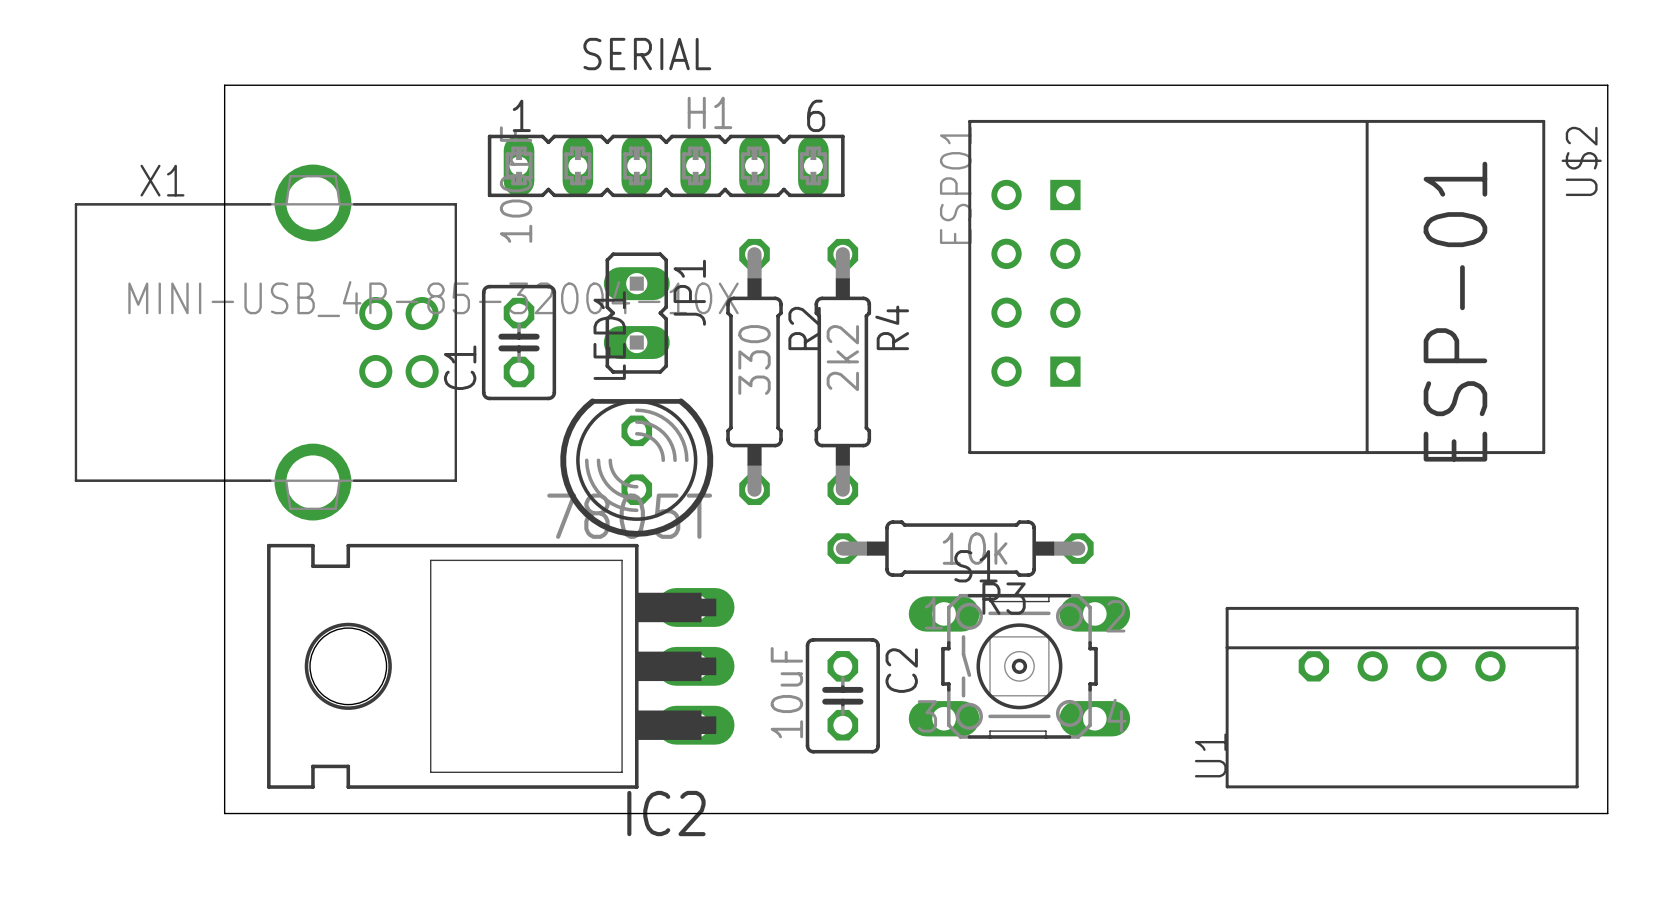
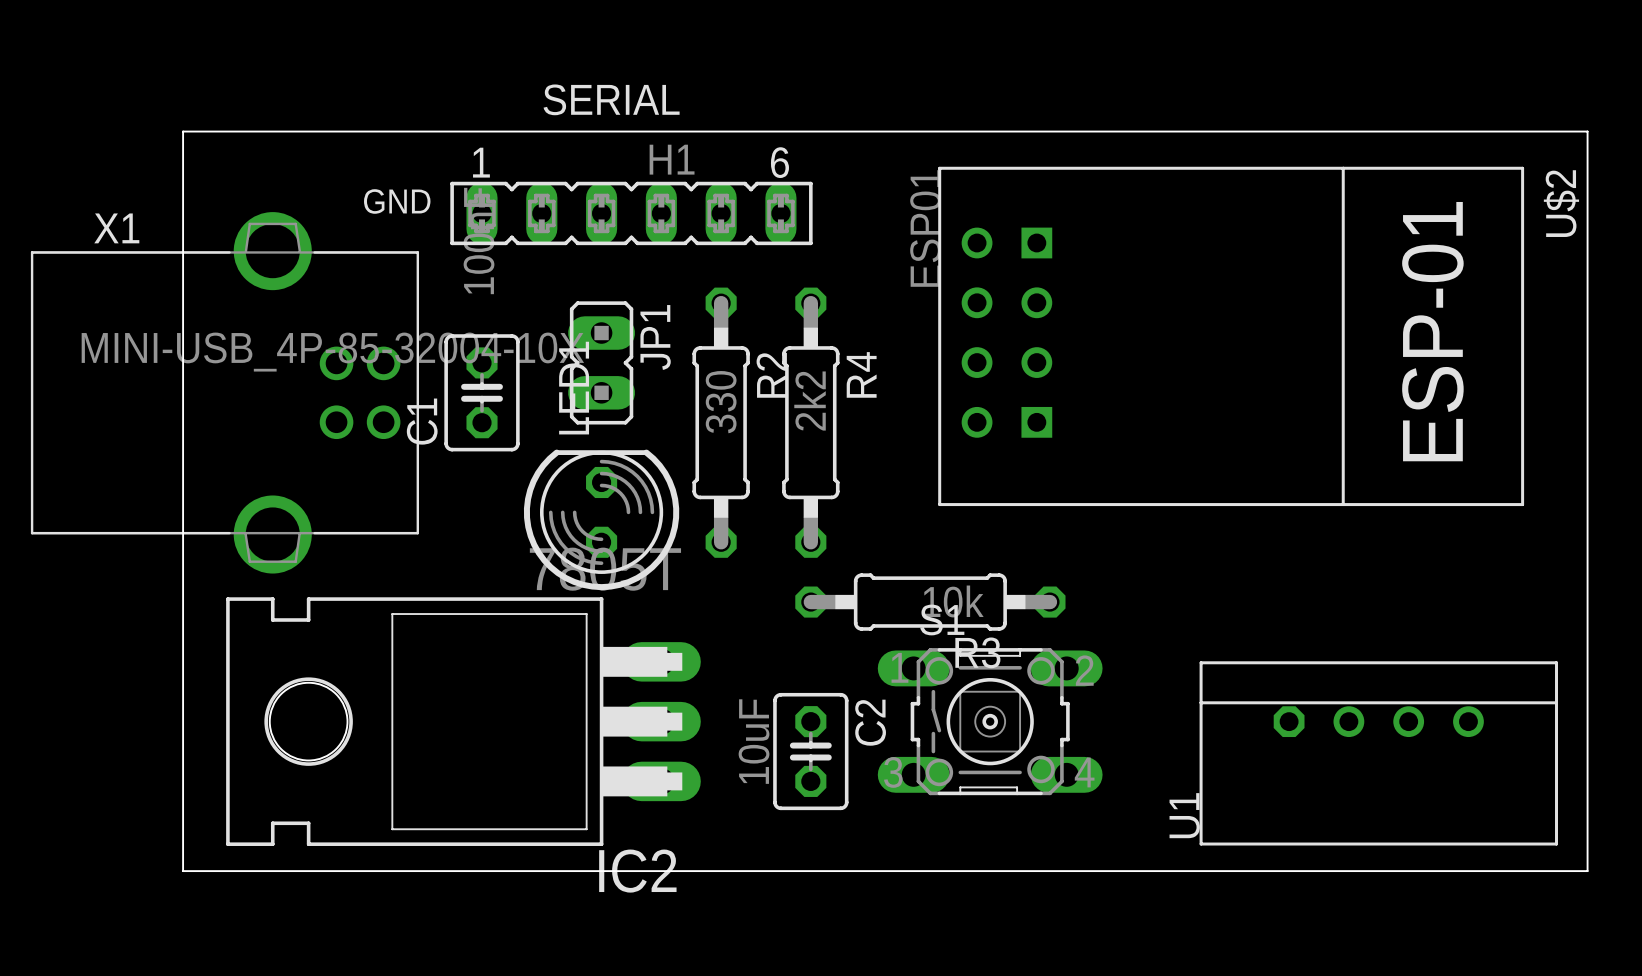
text: none -> GND (397, 201)

